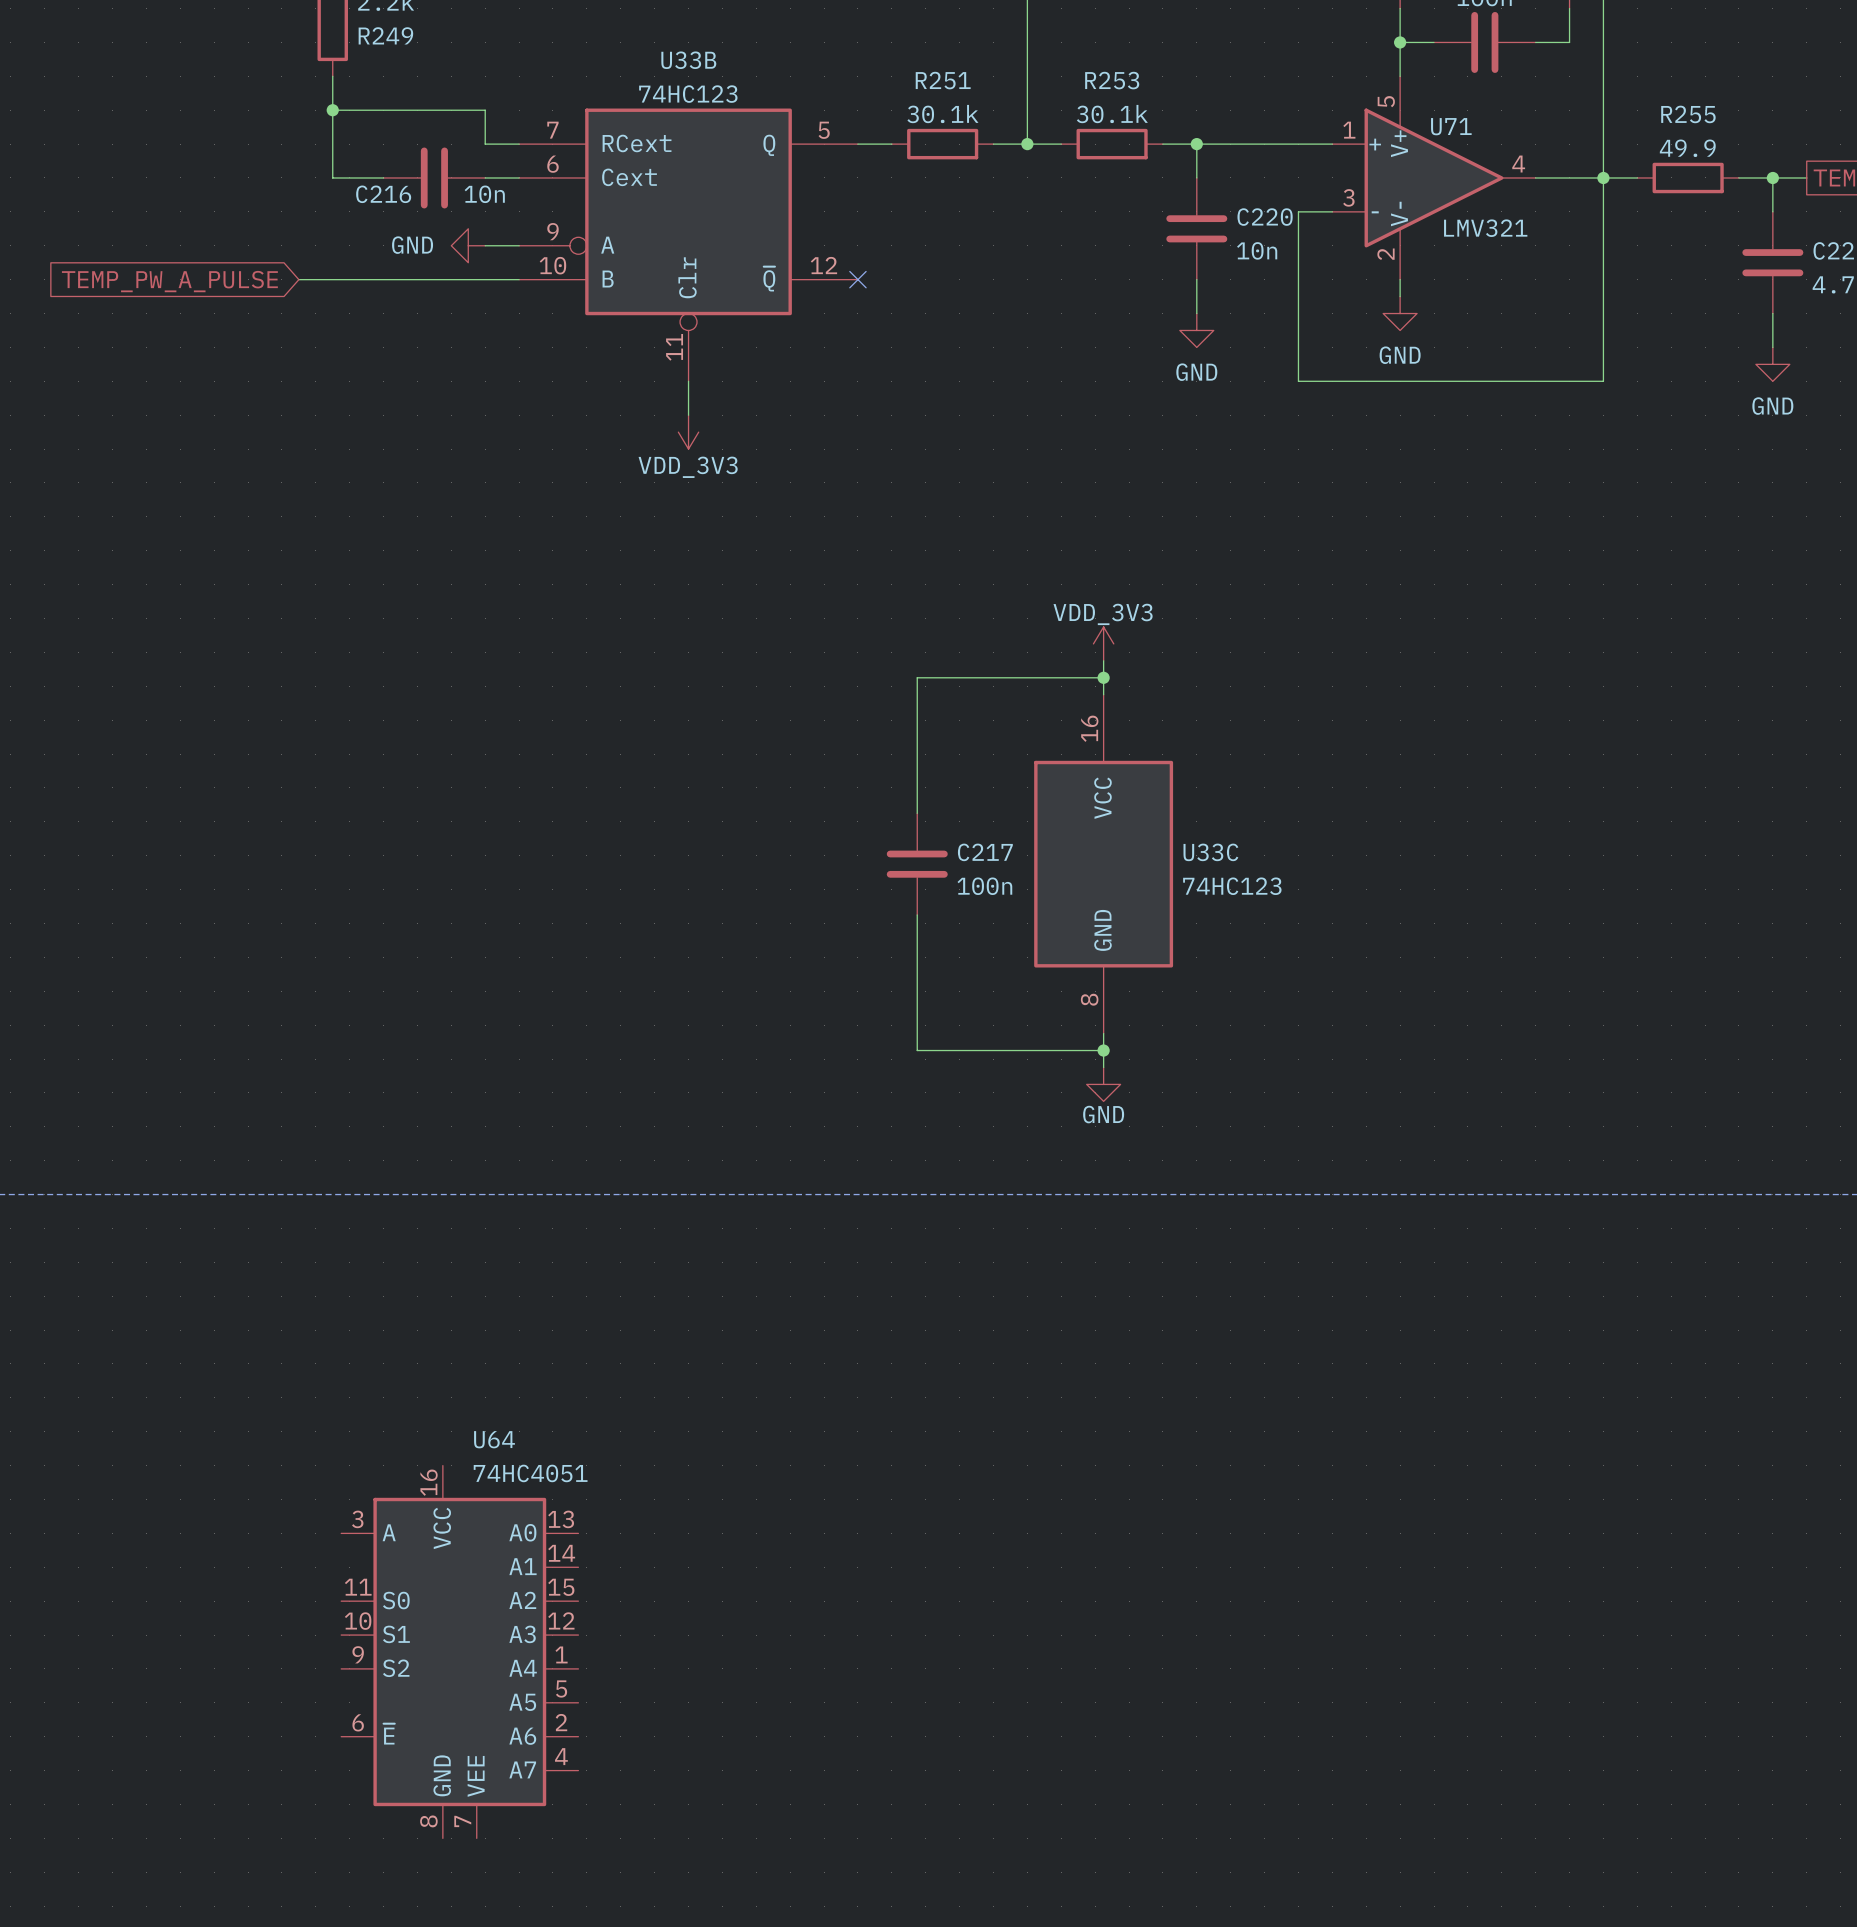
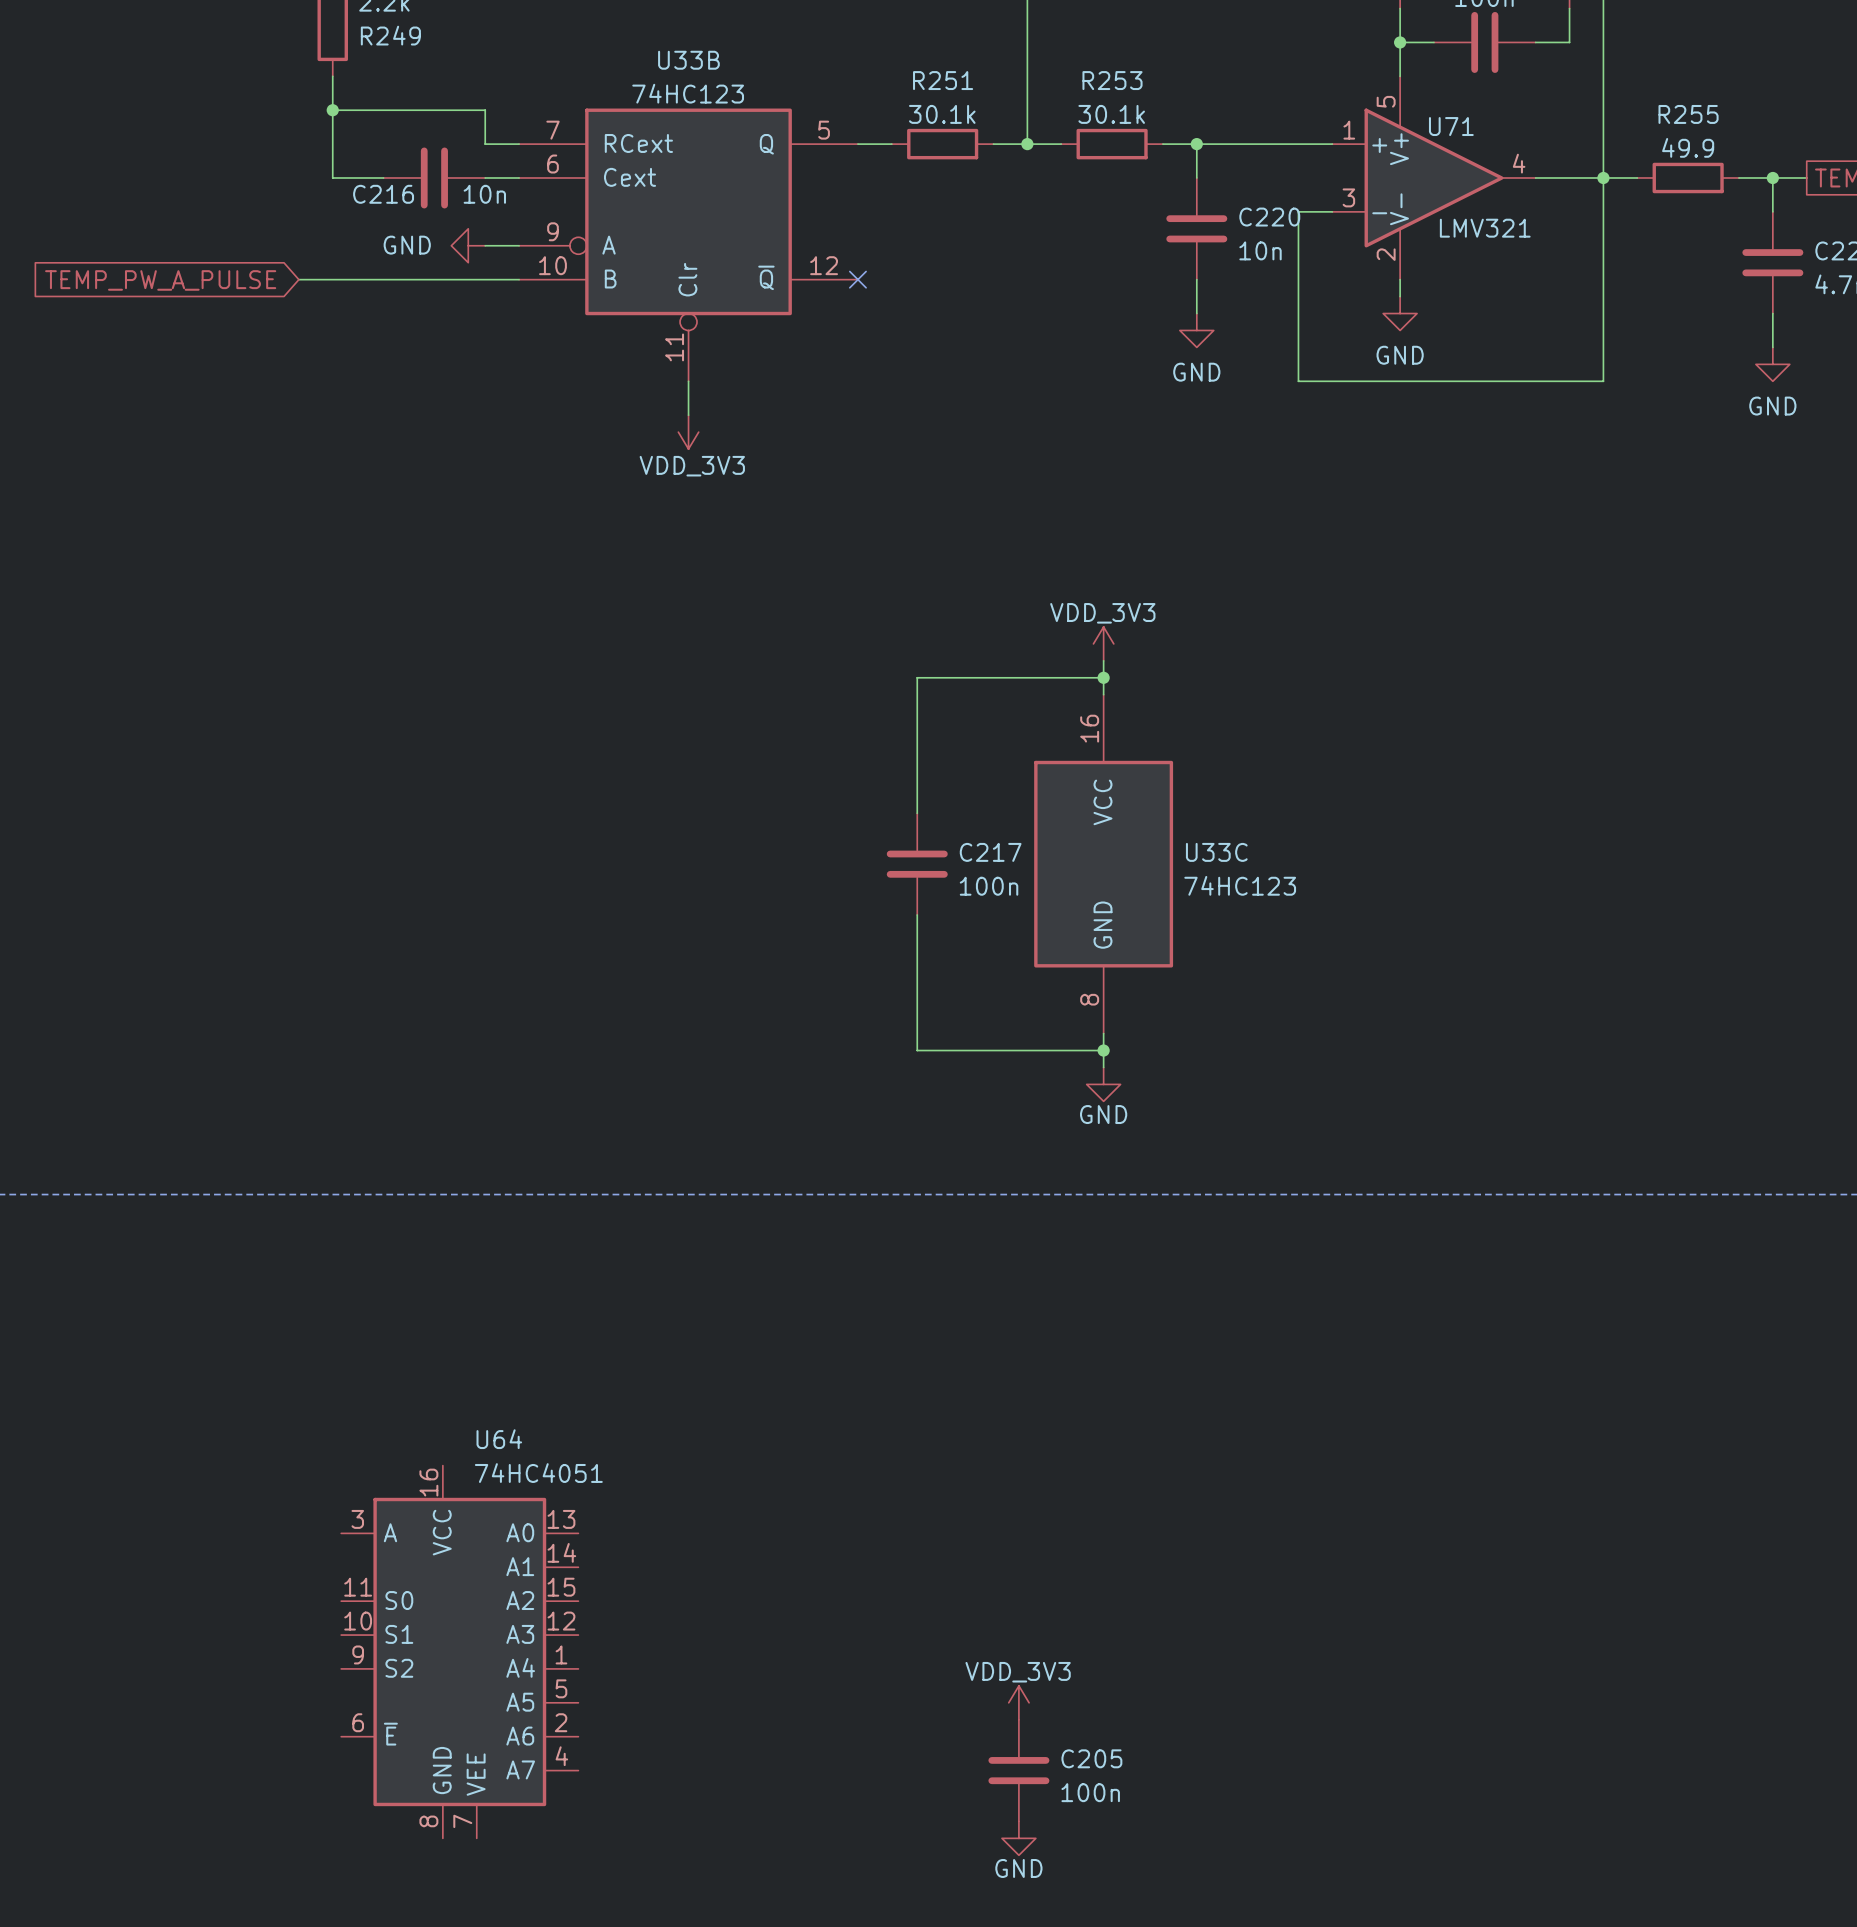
power symbol: none -> VDD_3V3 (1018, 1702)
C205: none -> 100n (1018, 1770)
power symbol: none -> GND (1018, 1838)

